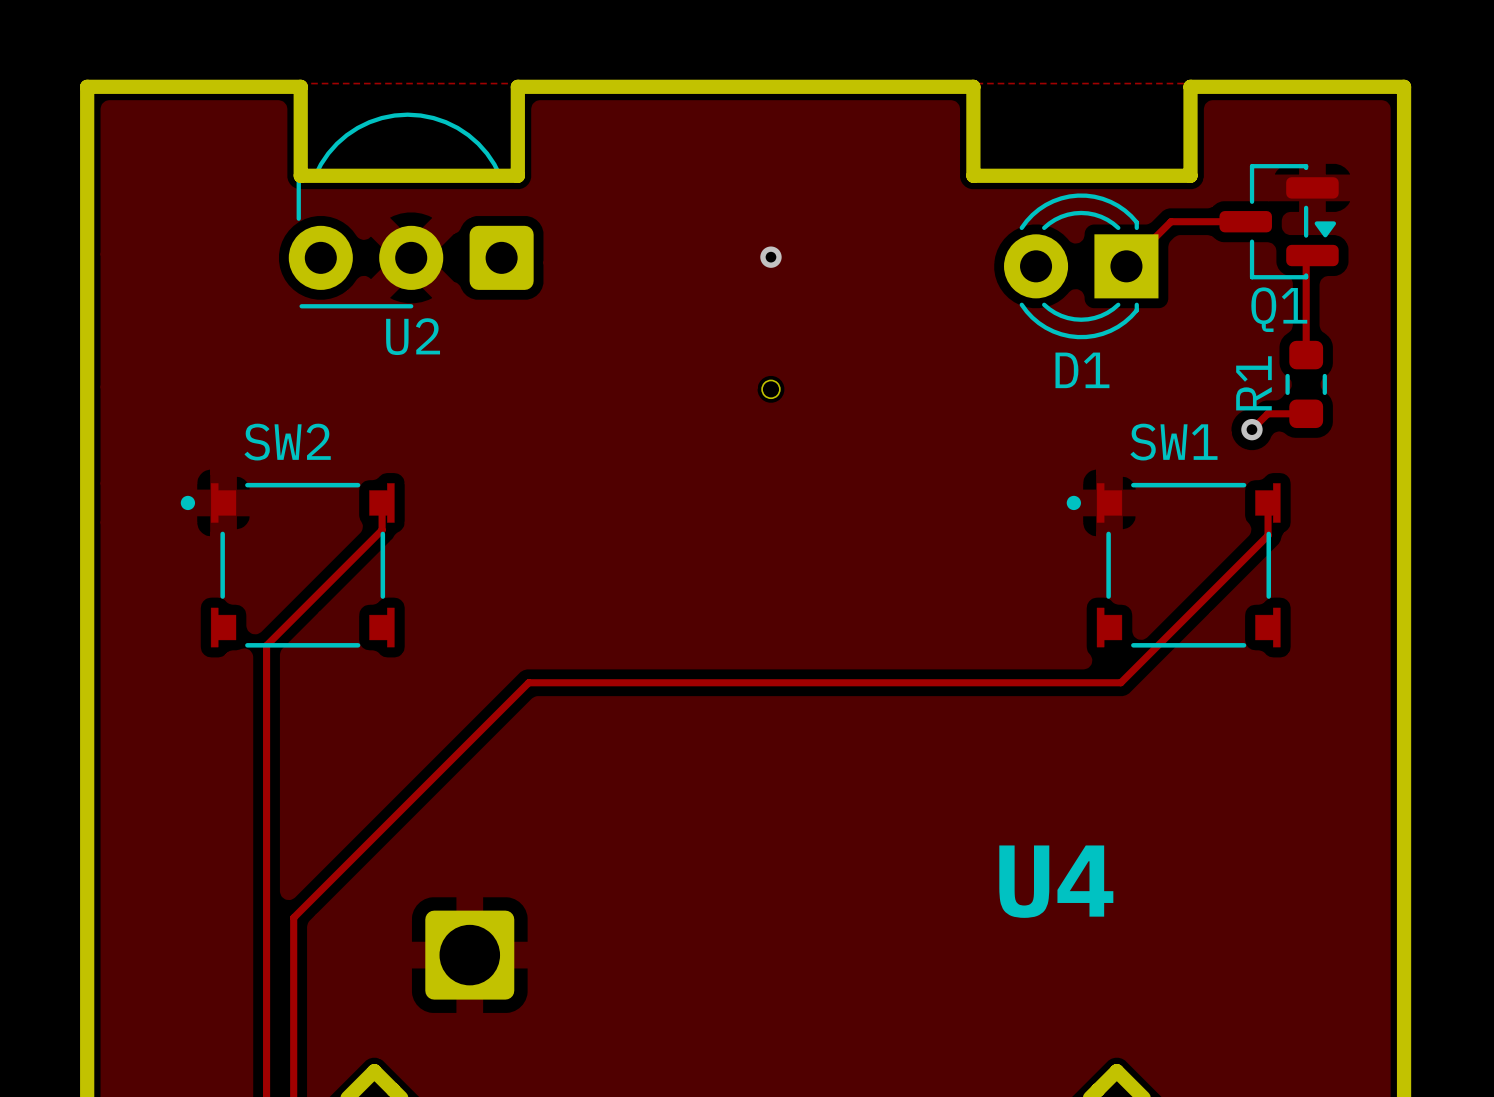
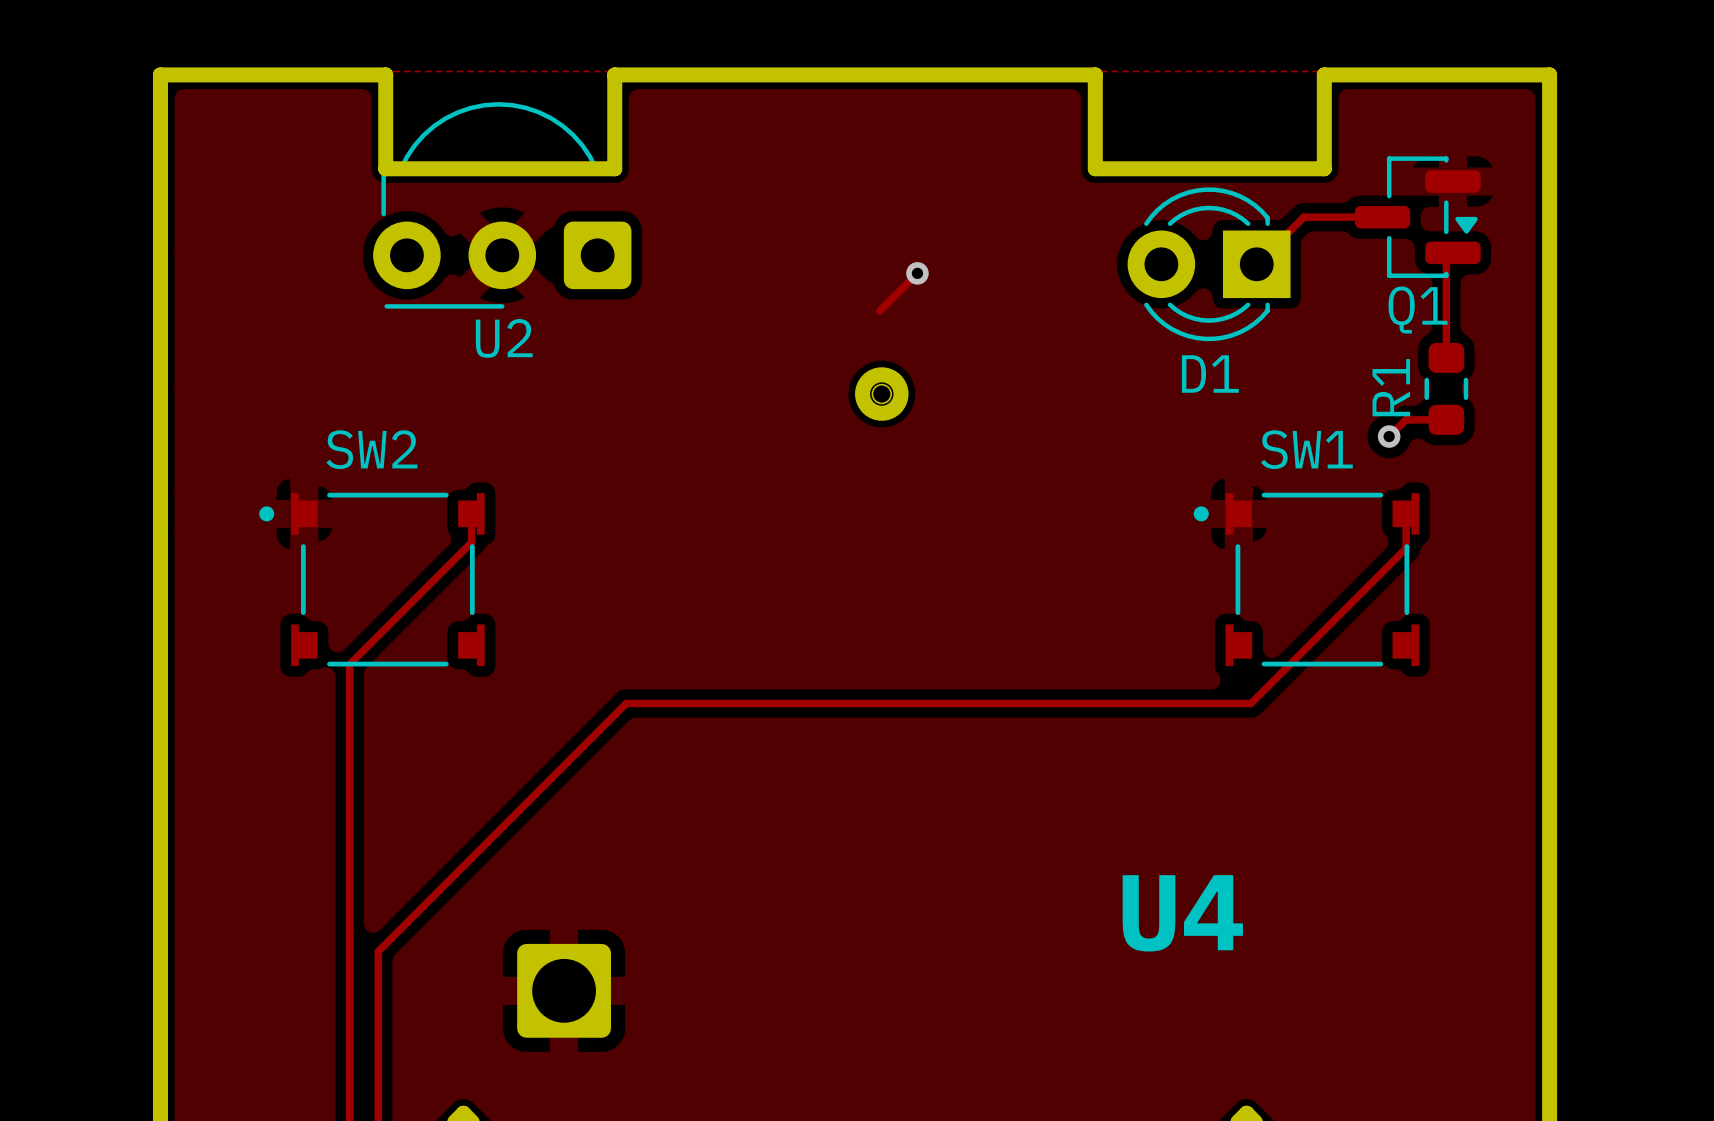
via position: (770, 257) -> (917, 273)
track: none -> (917, 273) (879, 310)
round board edge: none -> [855, 367, 909, 421]

